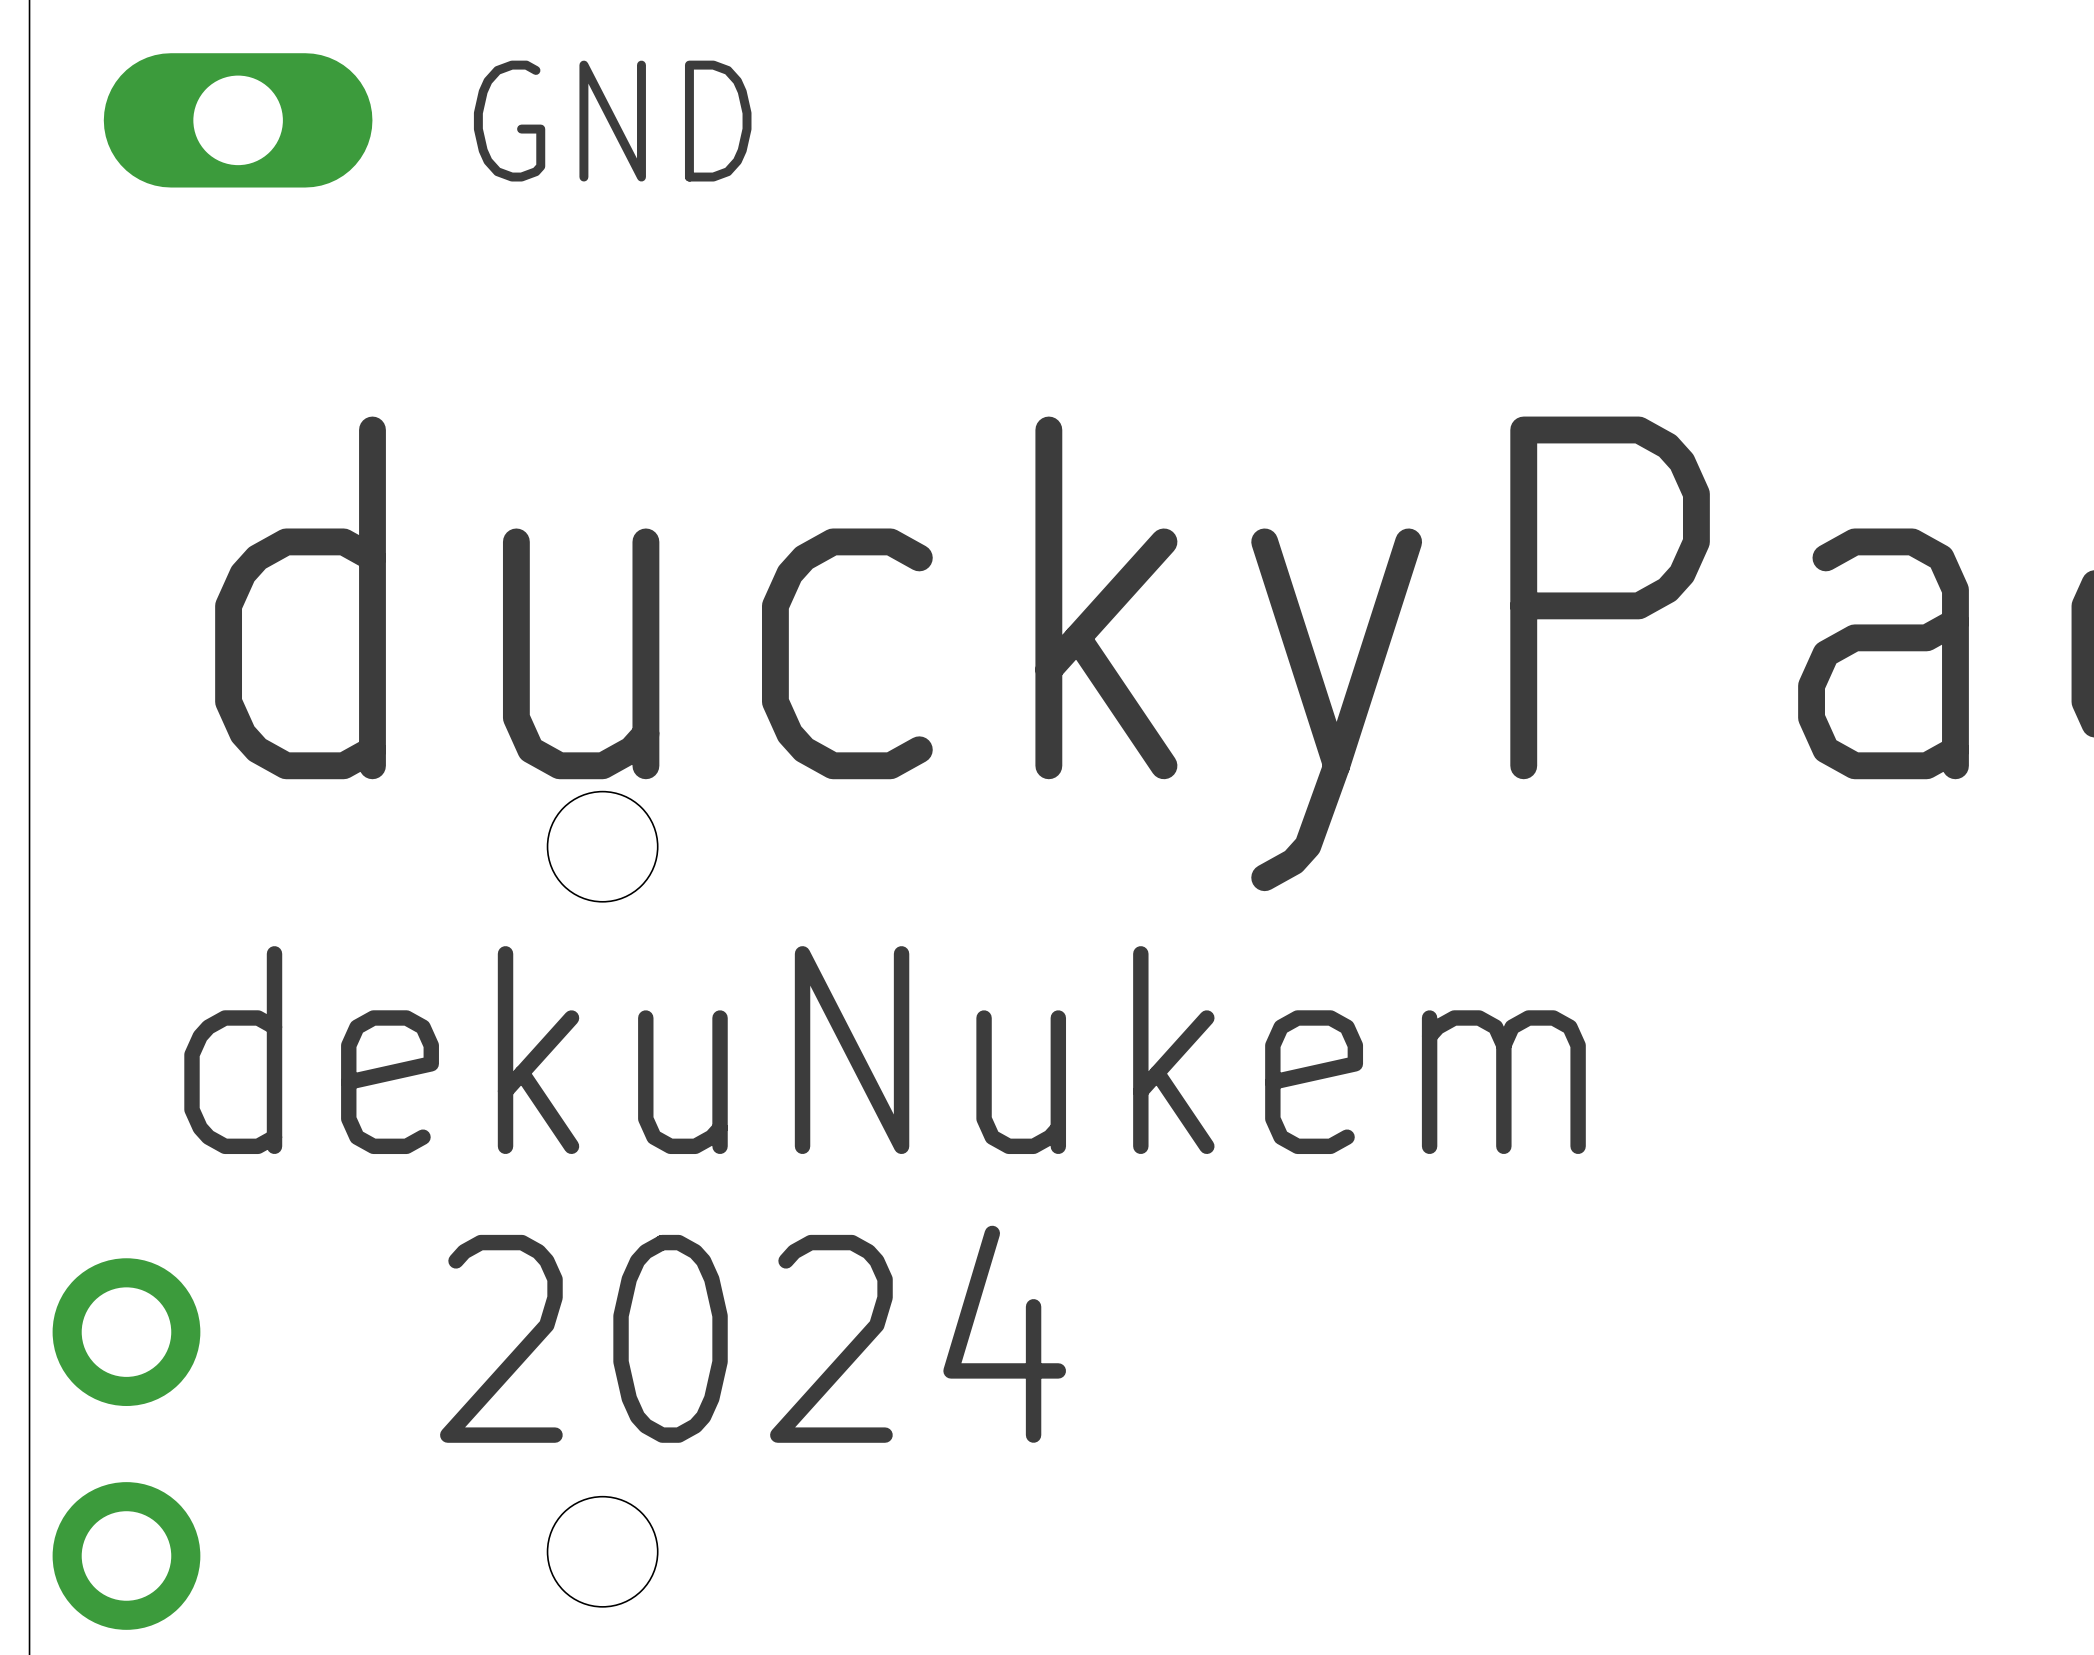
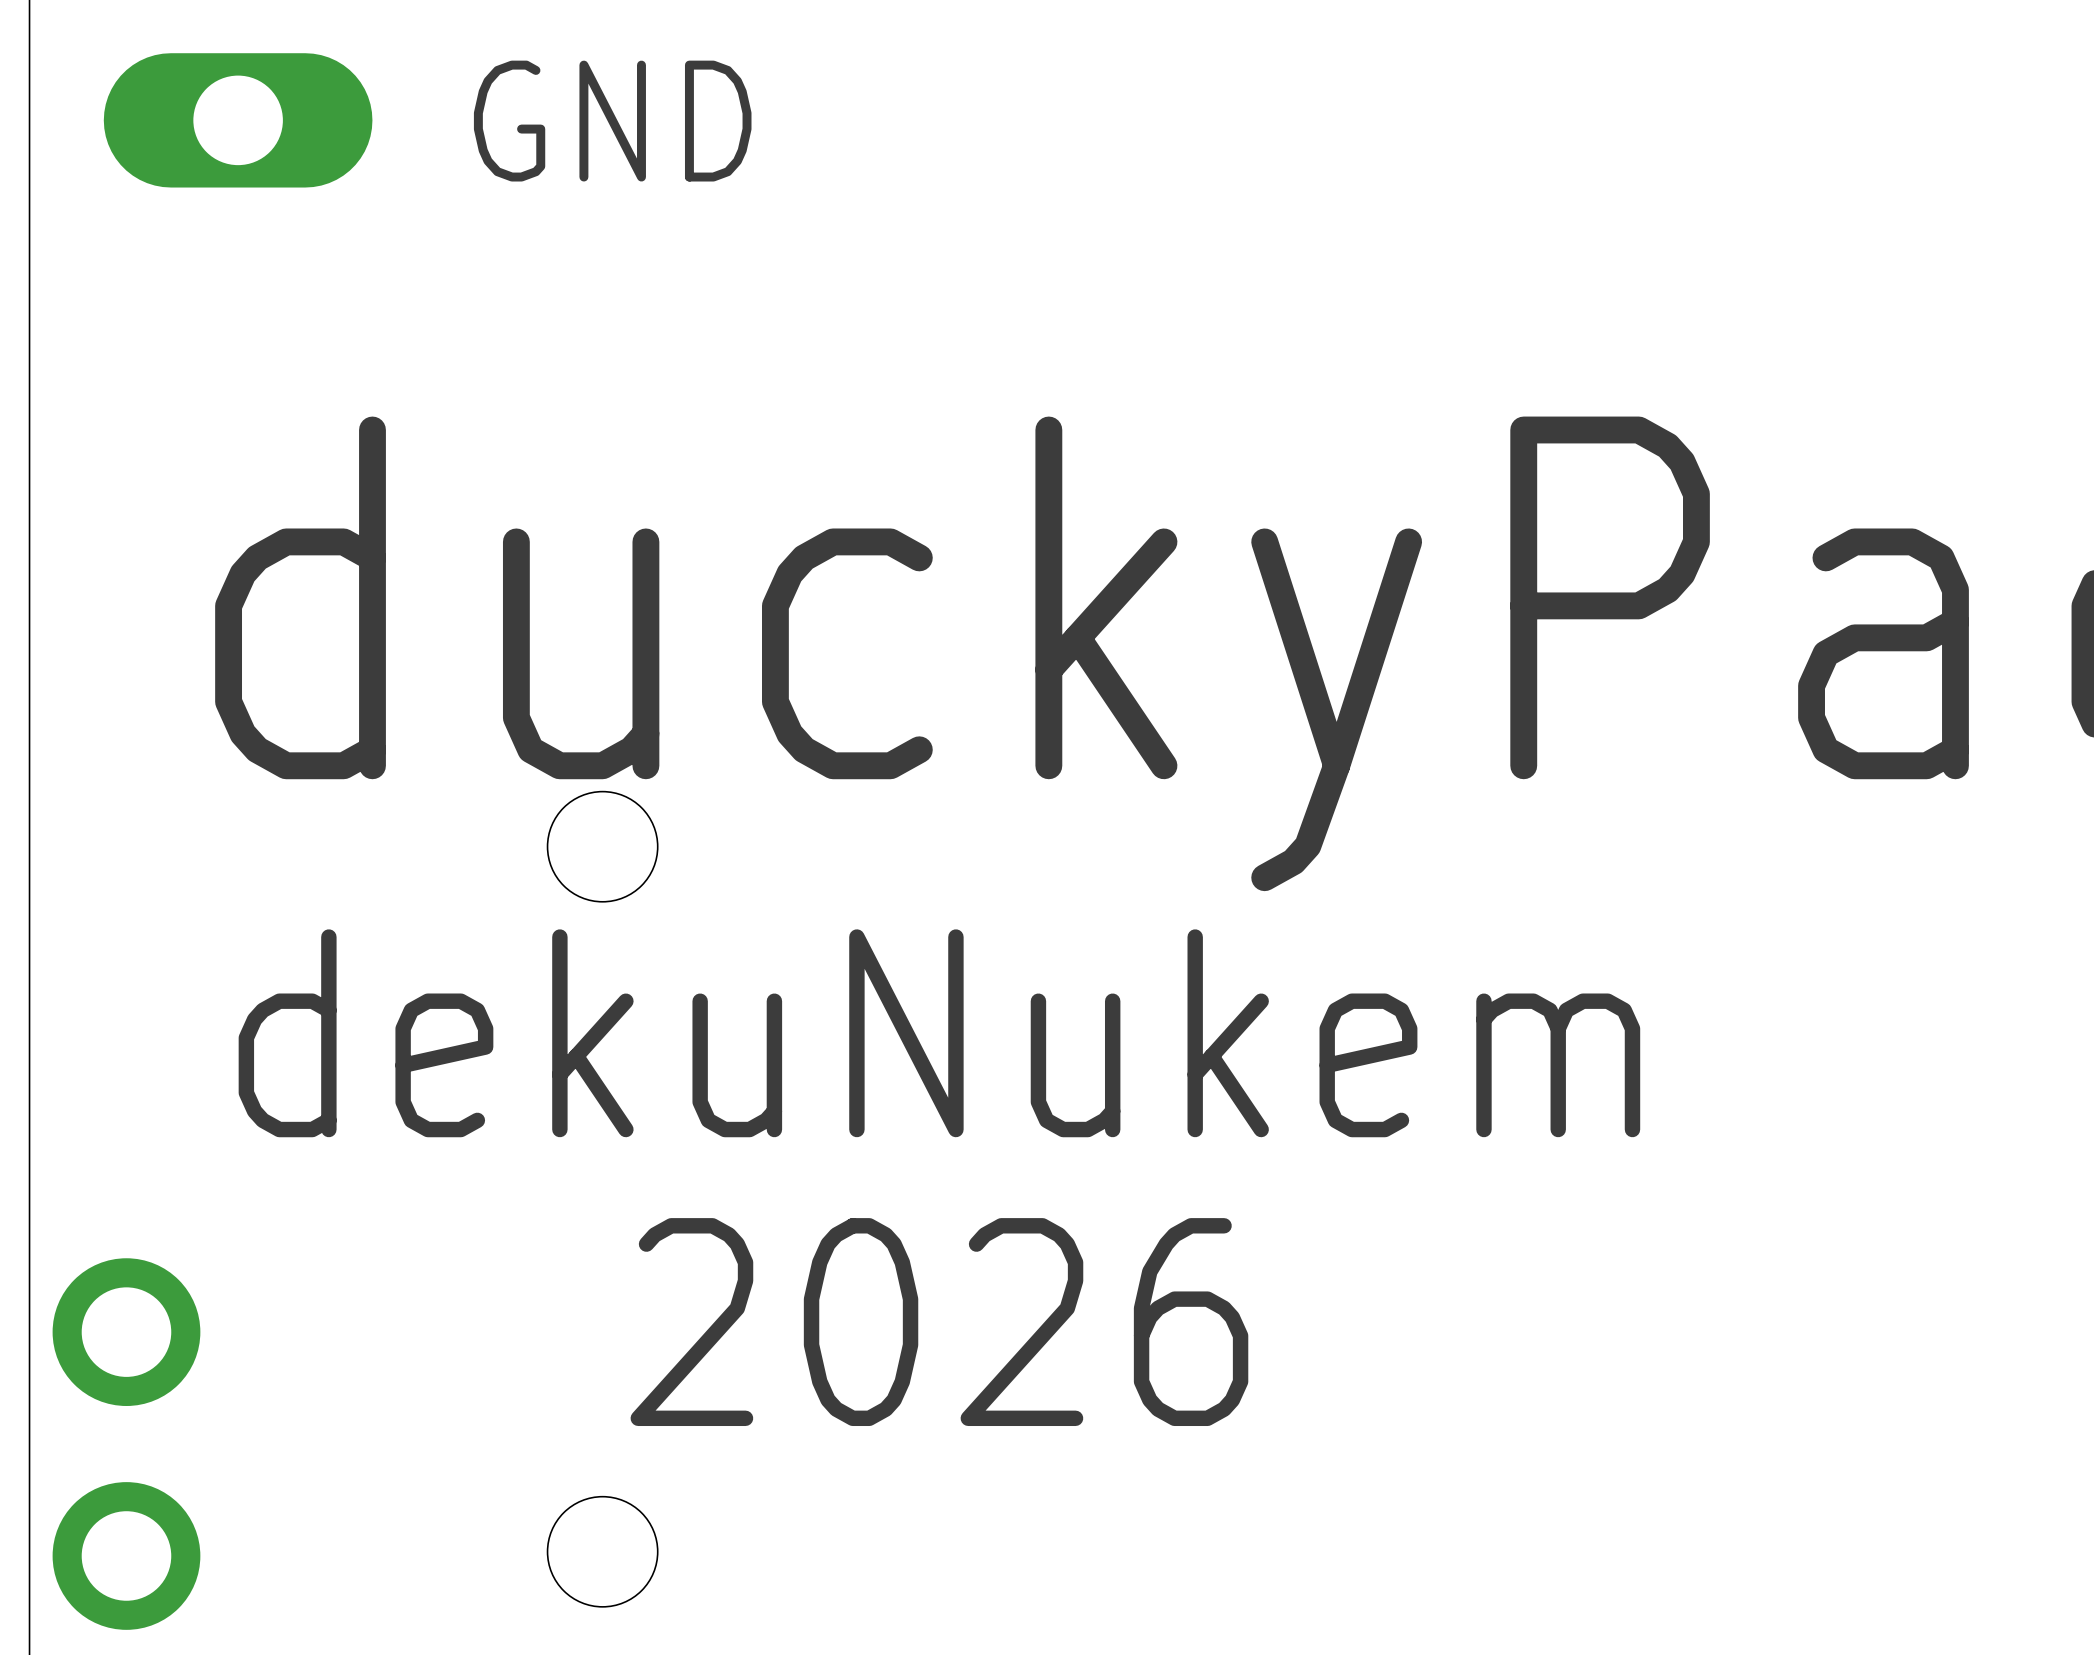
text position: dekuNukem (885, 1050) -> dekuNukem (939, 1033)
text: none -> 2026 (939, 1322)
text: 2024 (753, 1334) -> none

